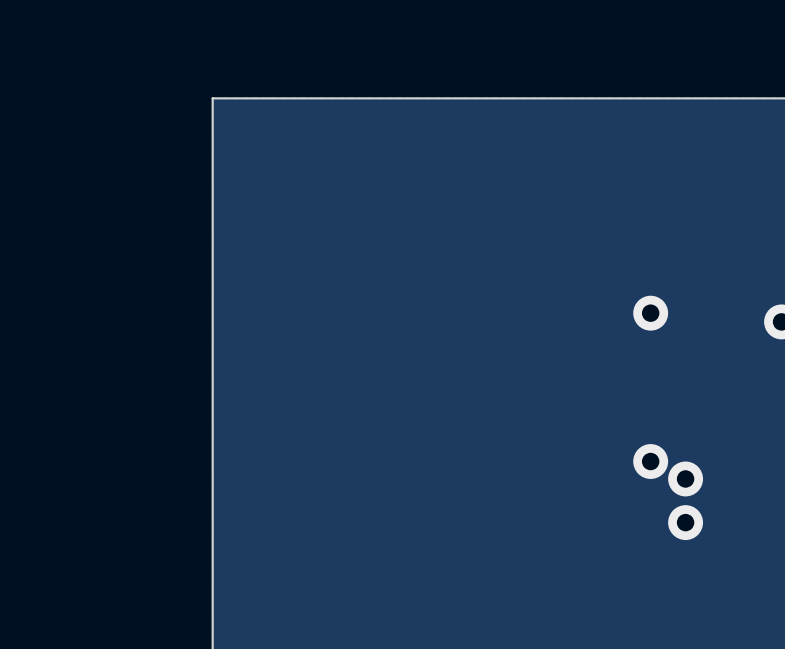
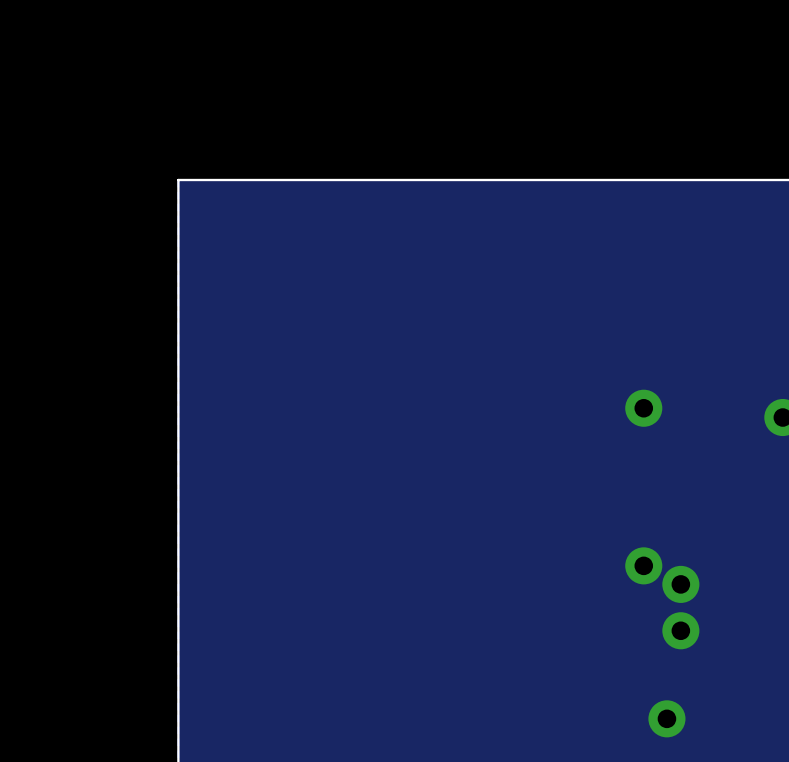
via: none -> (666, 718)

